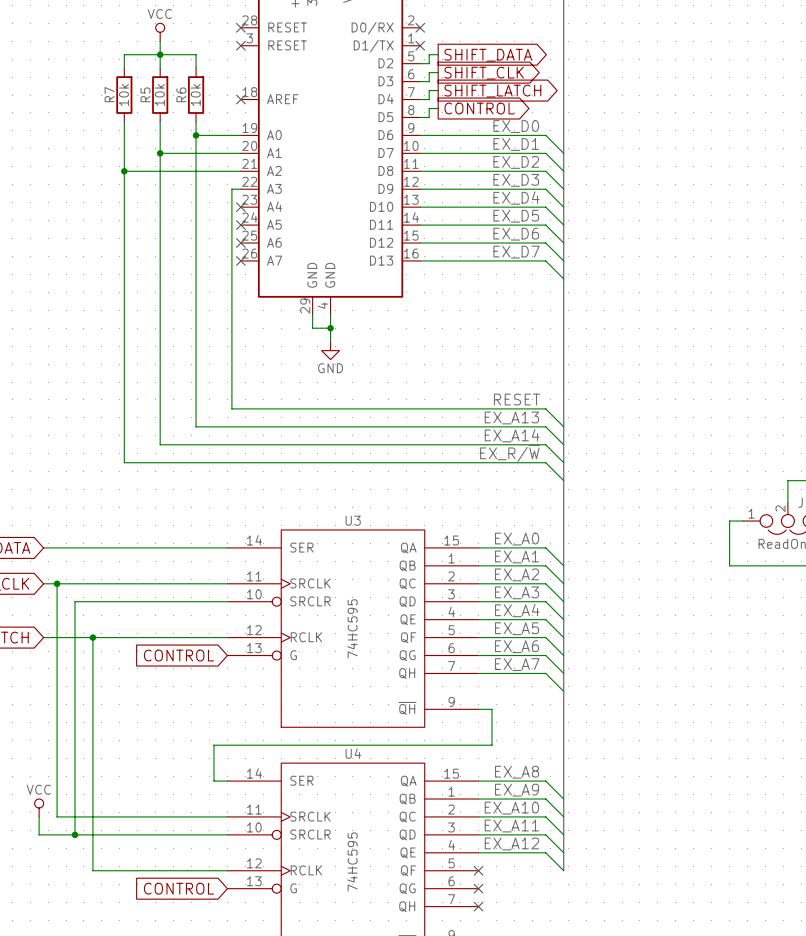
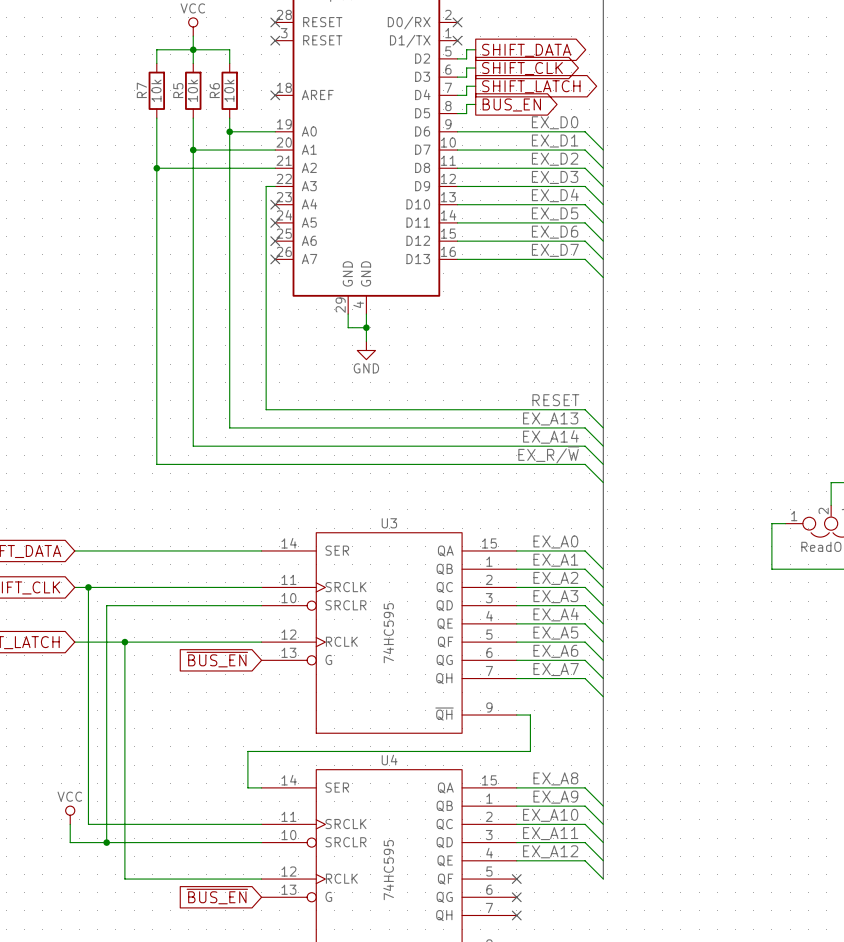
global label: CONTROL (479, 108) -> BUS_EN (511, 104)
global label: CONTROL (179, 655) -> ~{BUS_EN} (217, 659)
global label: CONTROL (179, 888) -> ~{BUS_EN} (217, 896)

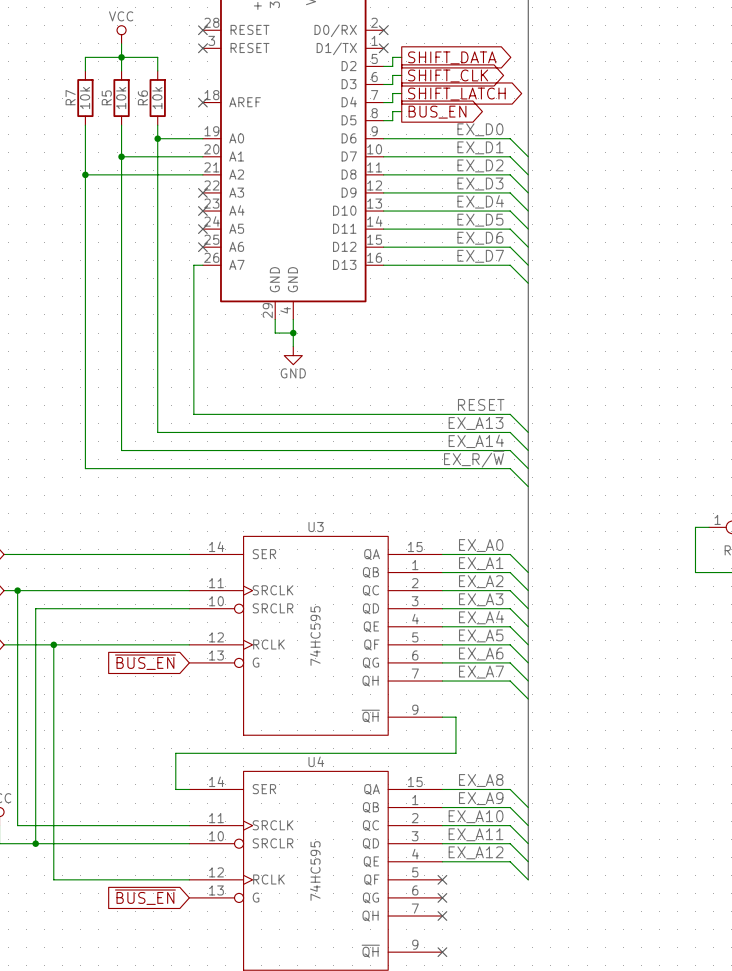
wire: (275, 186) (266, 186) (266, 259) -> (202, 265) (193, 265)
no-connect mark: none -> (202, 192)
no-connect mark: (275, 259) -> none

